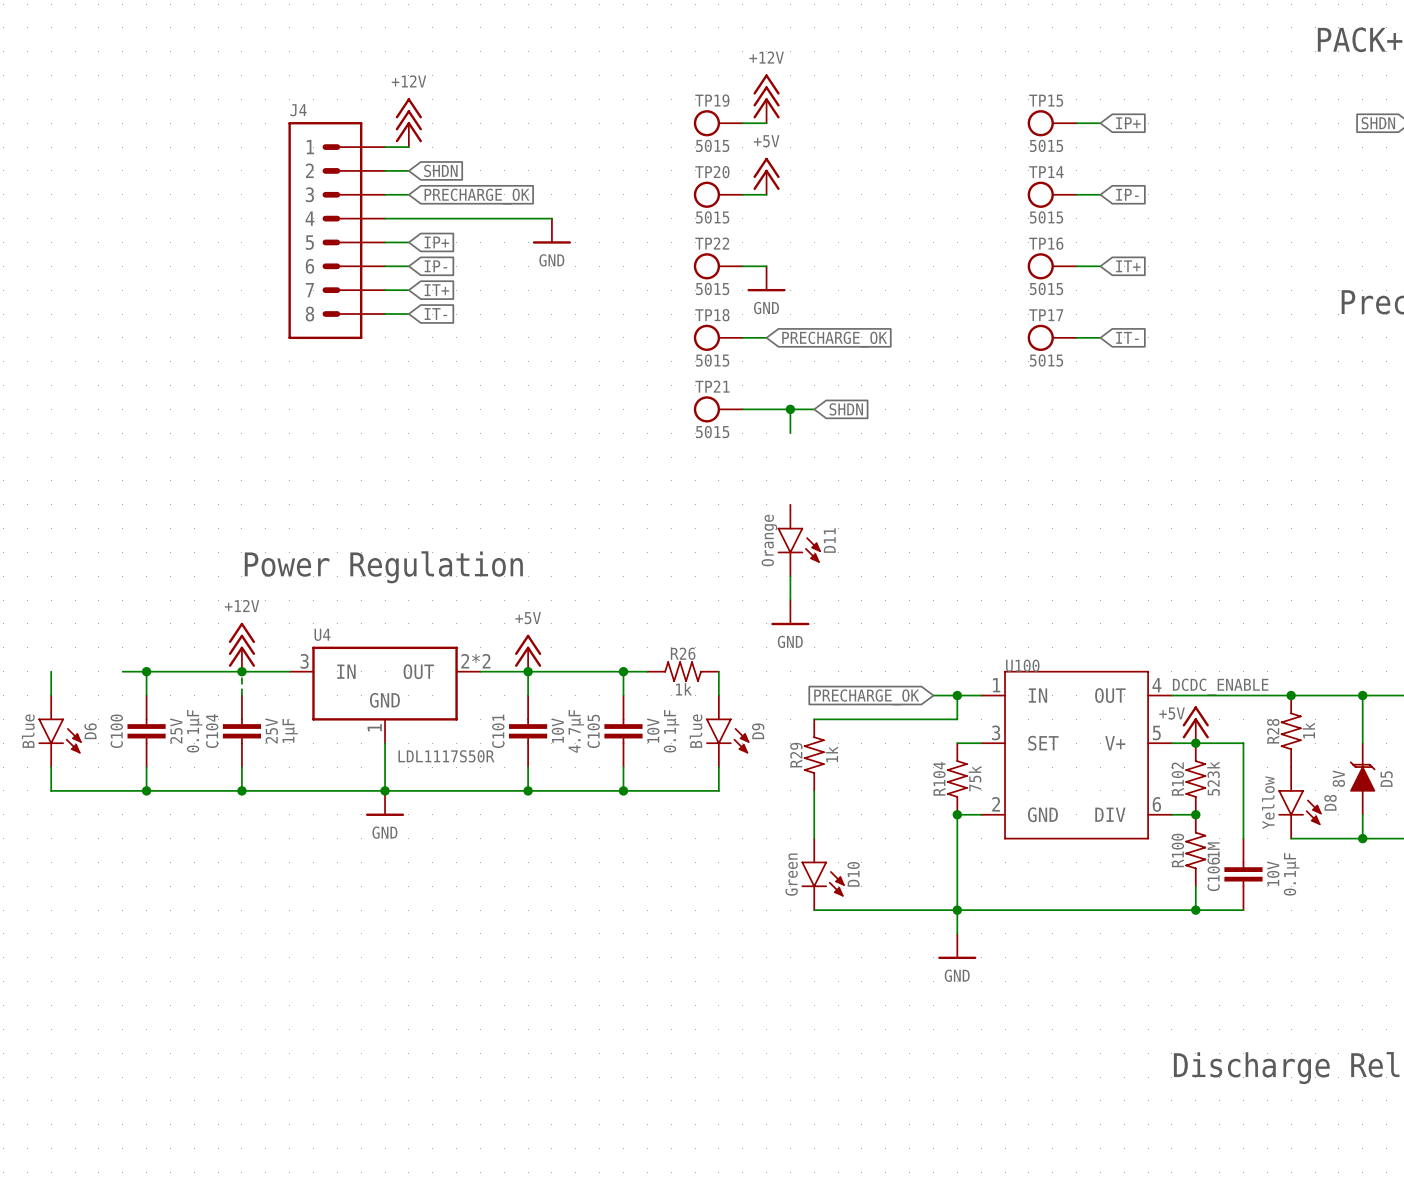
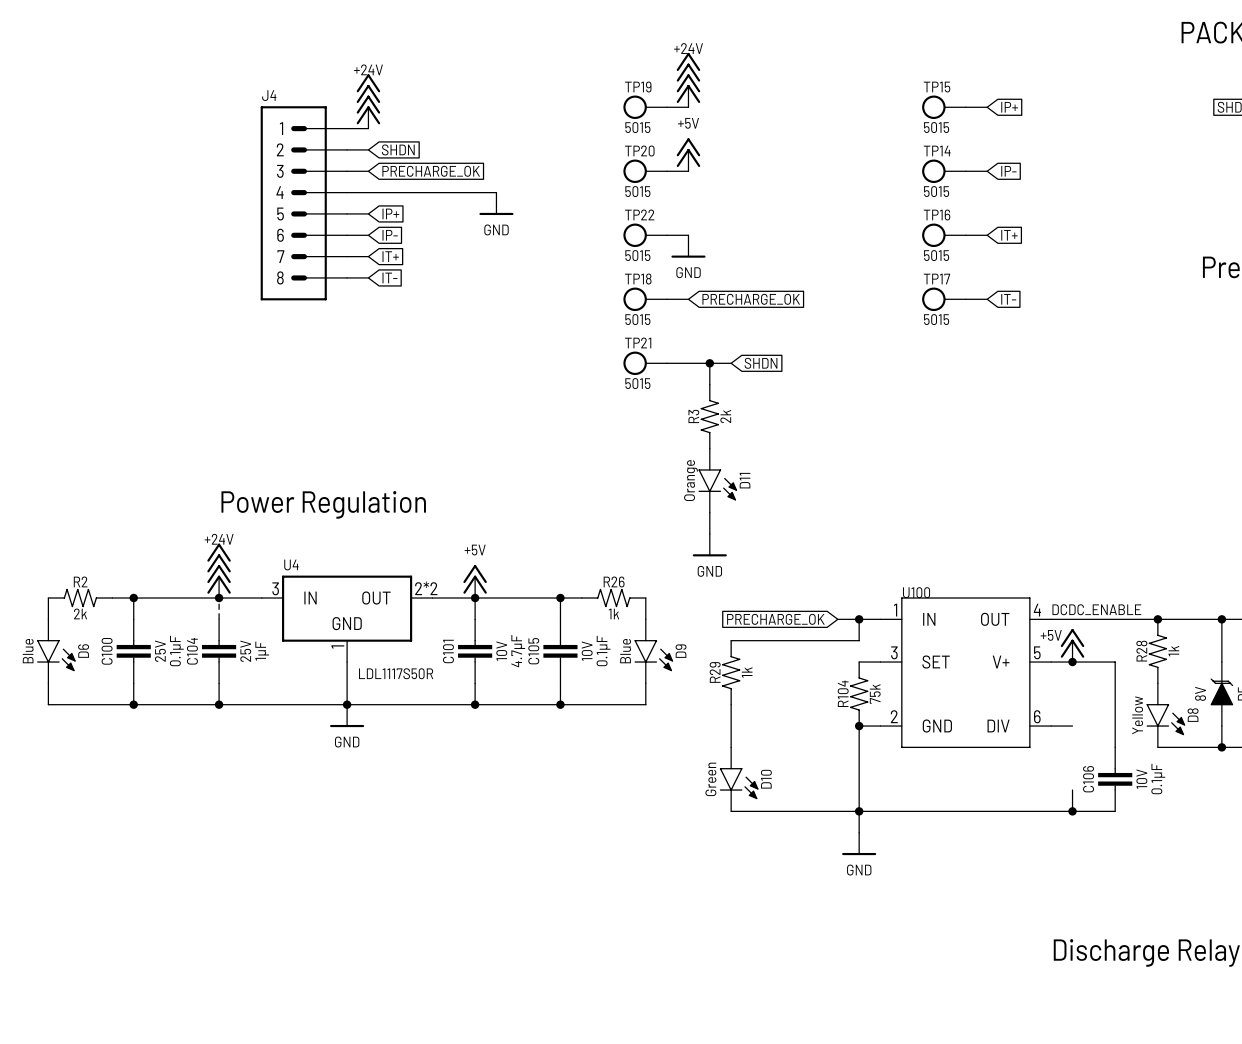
power symbol: +12V (766, 98) -> +24V (688, 80)
power symbol: +12V (408, 122) -> +24V (368, 101)
R3: none -> (709, 416)
power symbol: +12V (241, 647) -> +24V (219, 570)
R2: none -> (80, 598)
R102: (1195, 778) -> none
junction: (1195, 814) -> none
R100: (1195, 850) -> none

